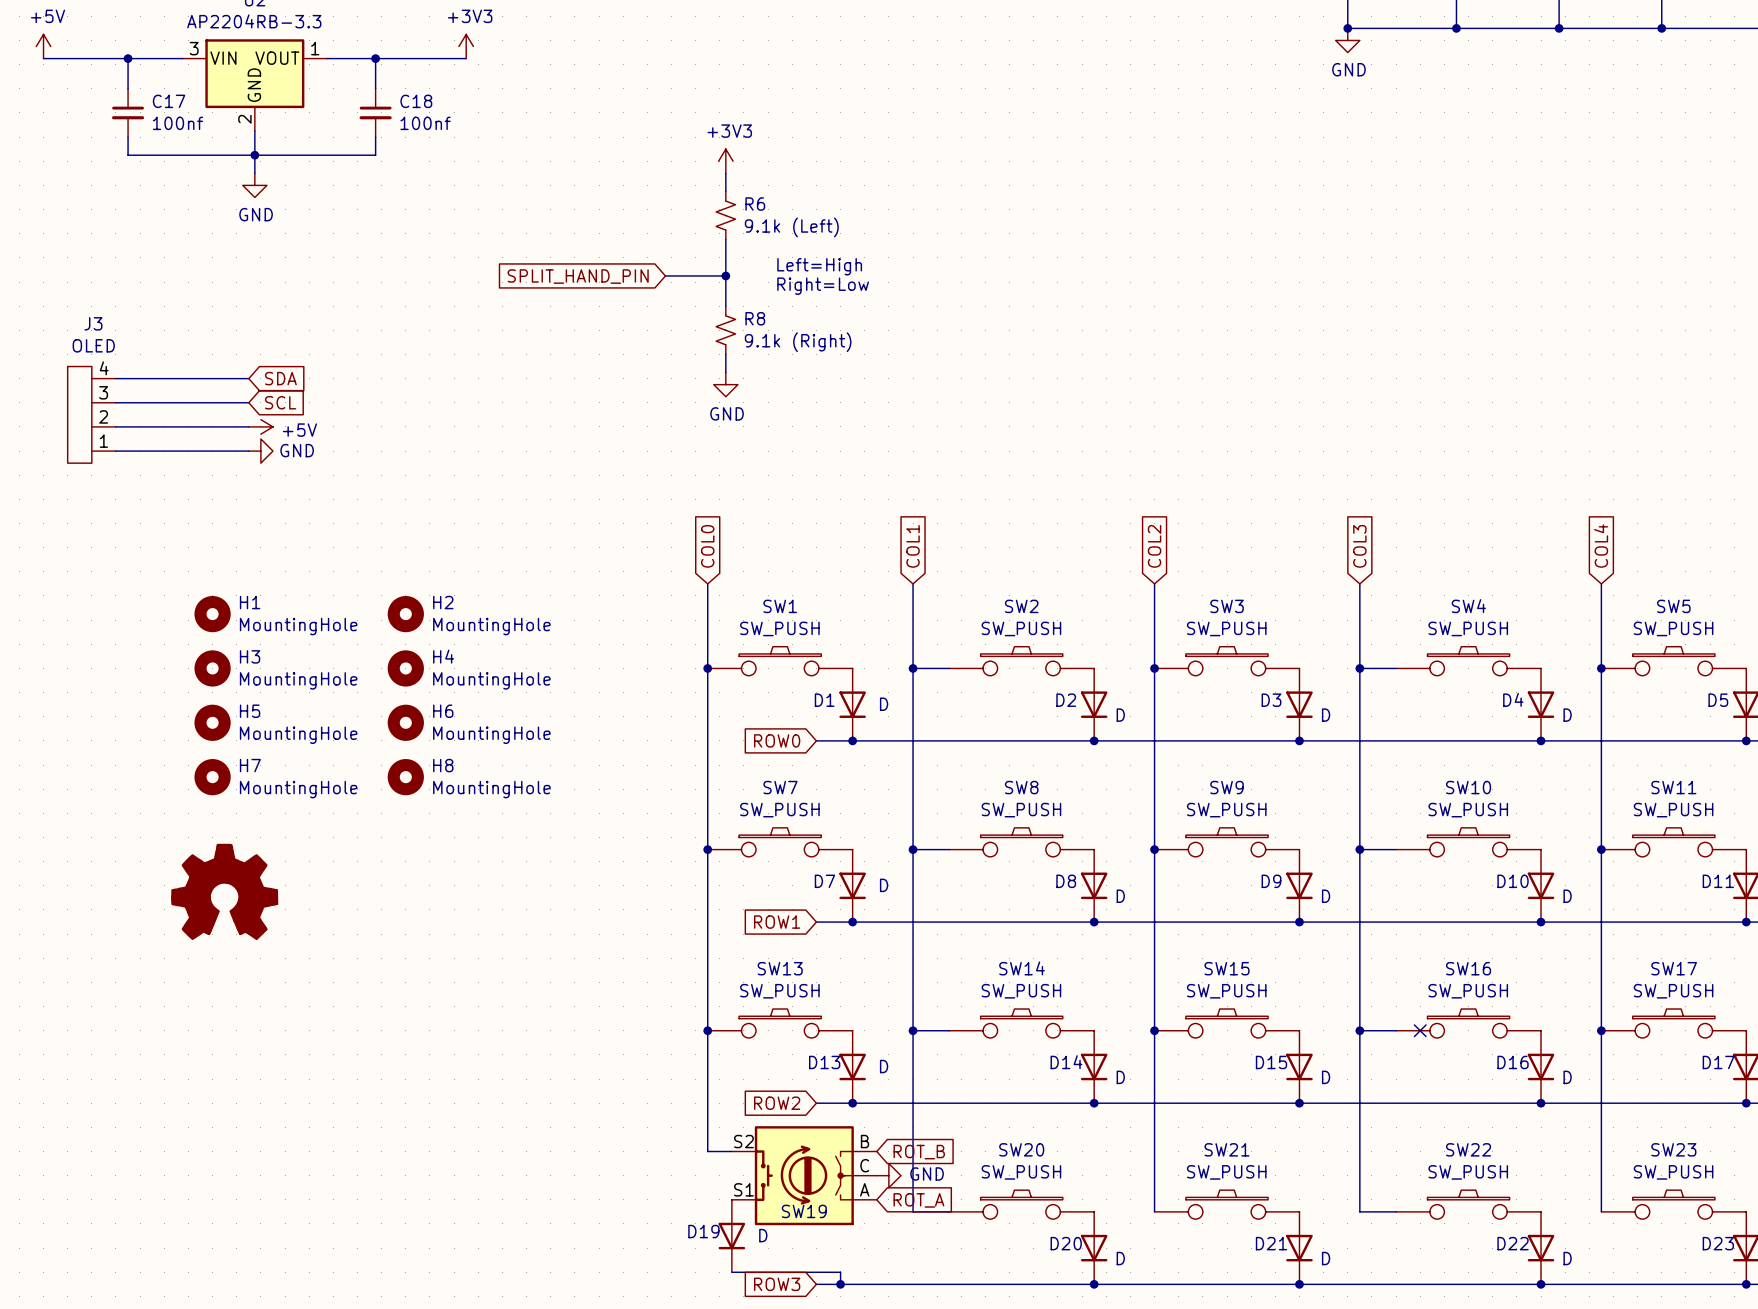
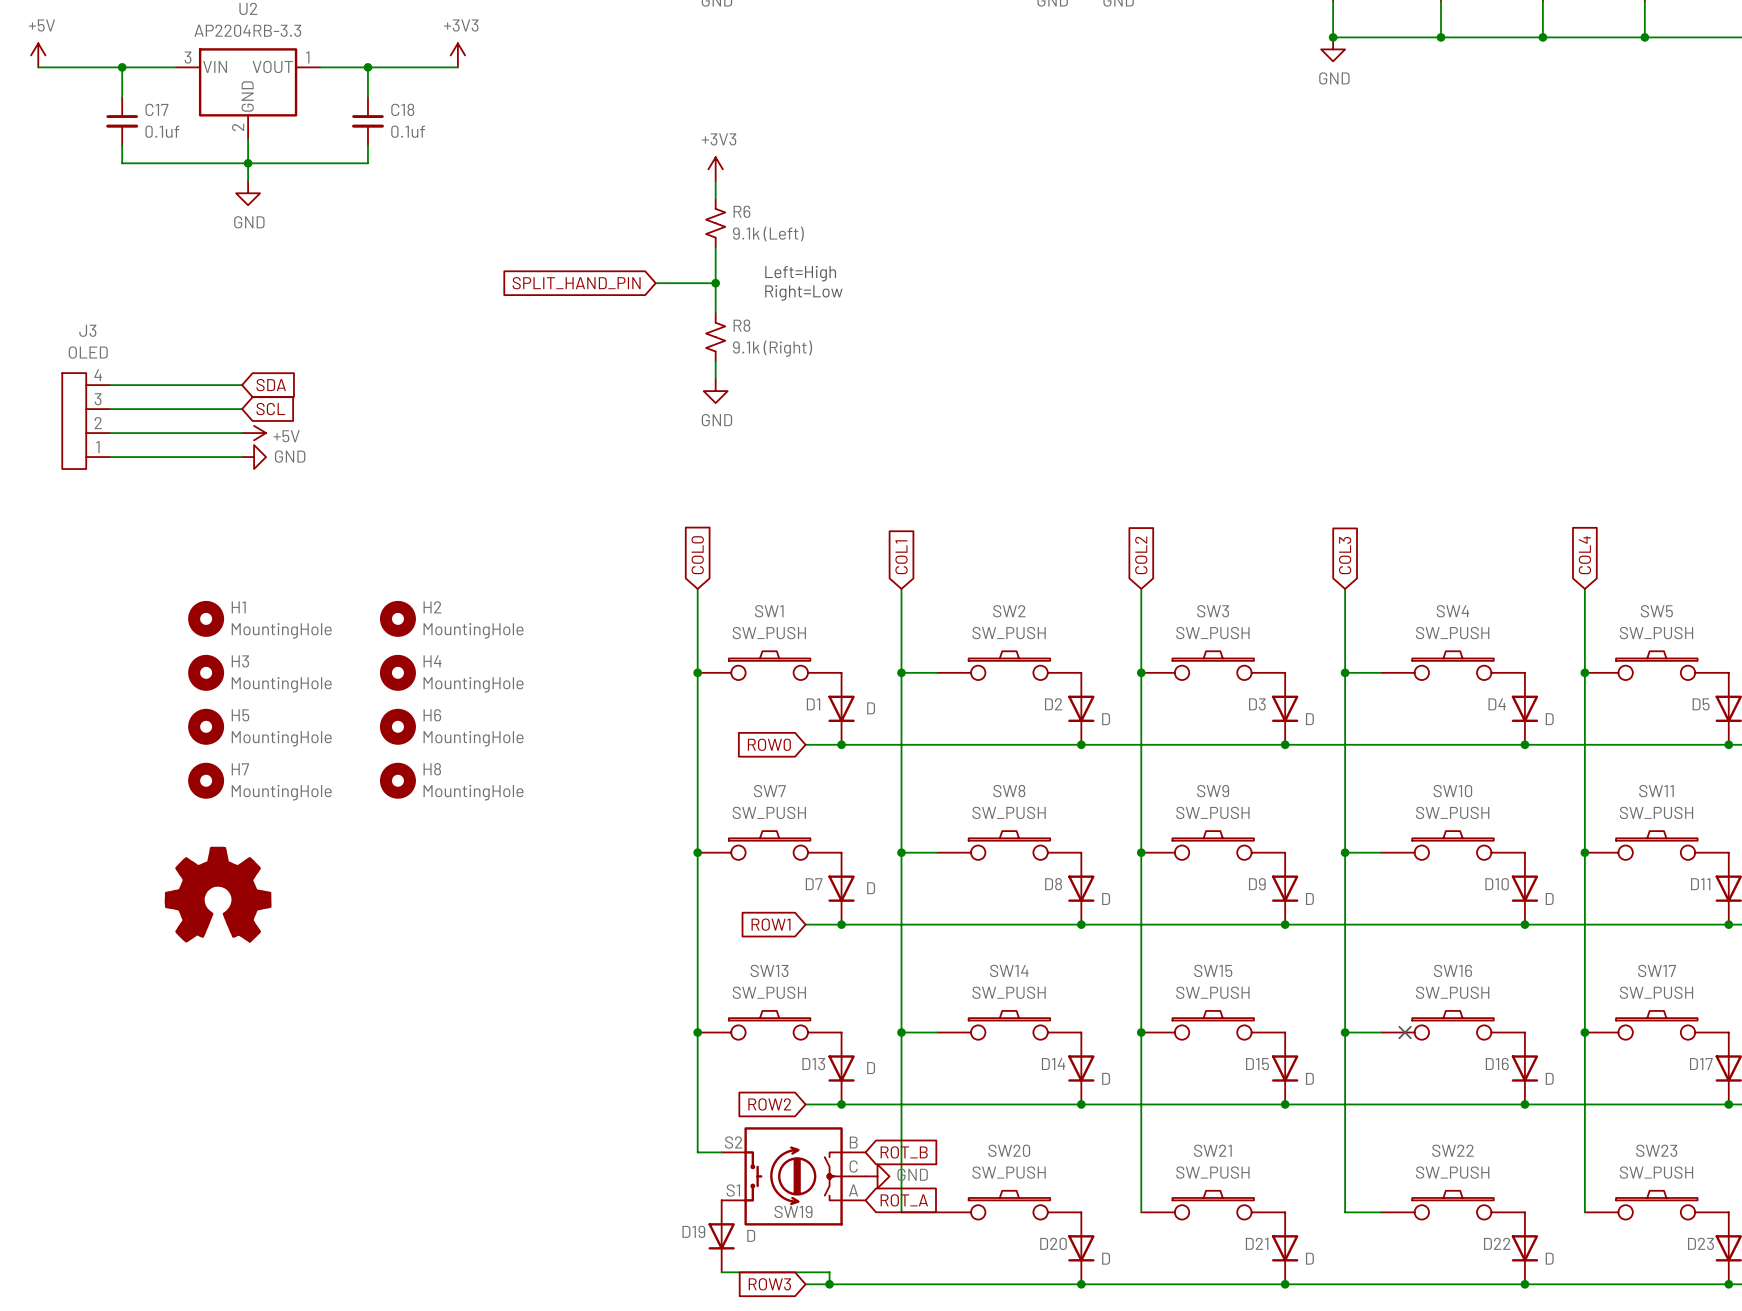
C17 value: 100nf (177, 123) -> 0.1uf (162, 131)
C18 value: 100nf (425, 123) -> 0.1uf (408, 131)

